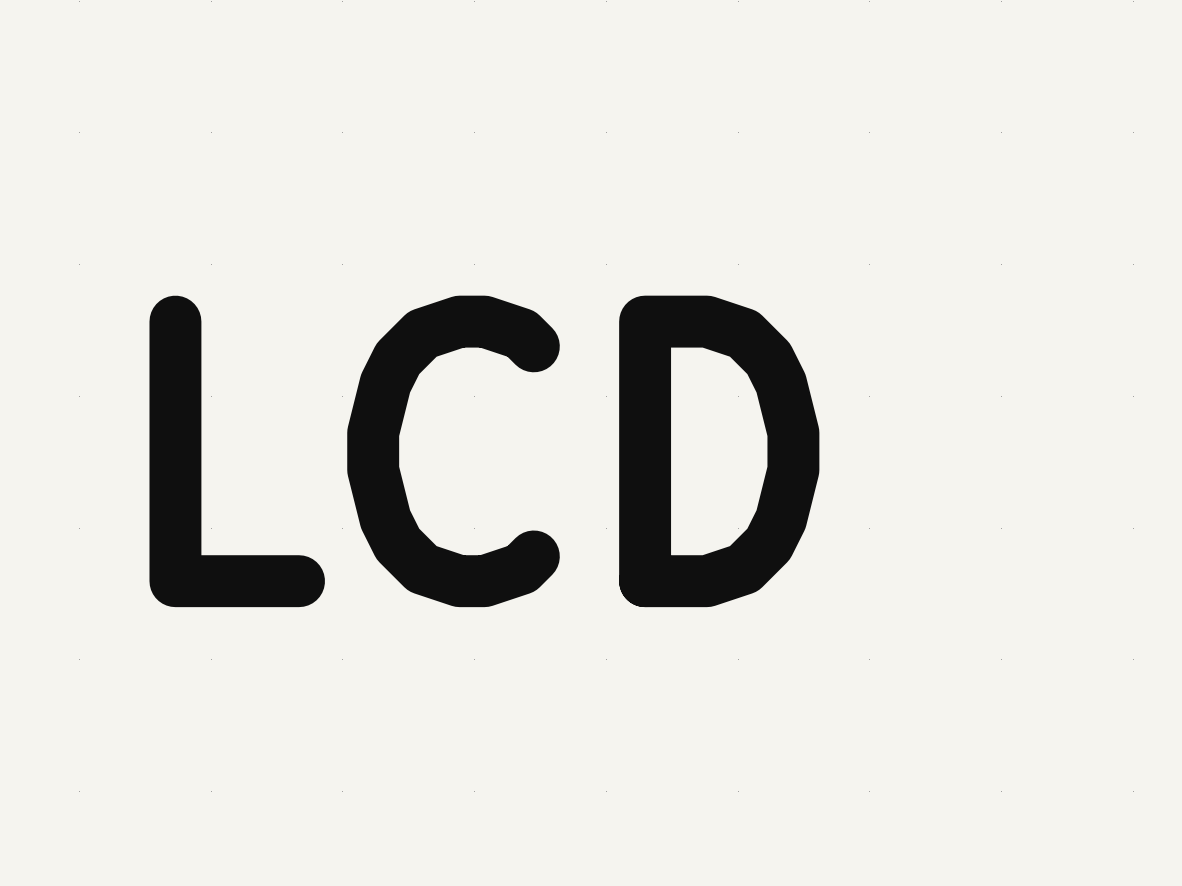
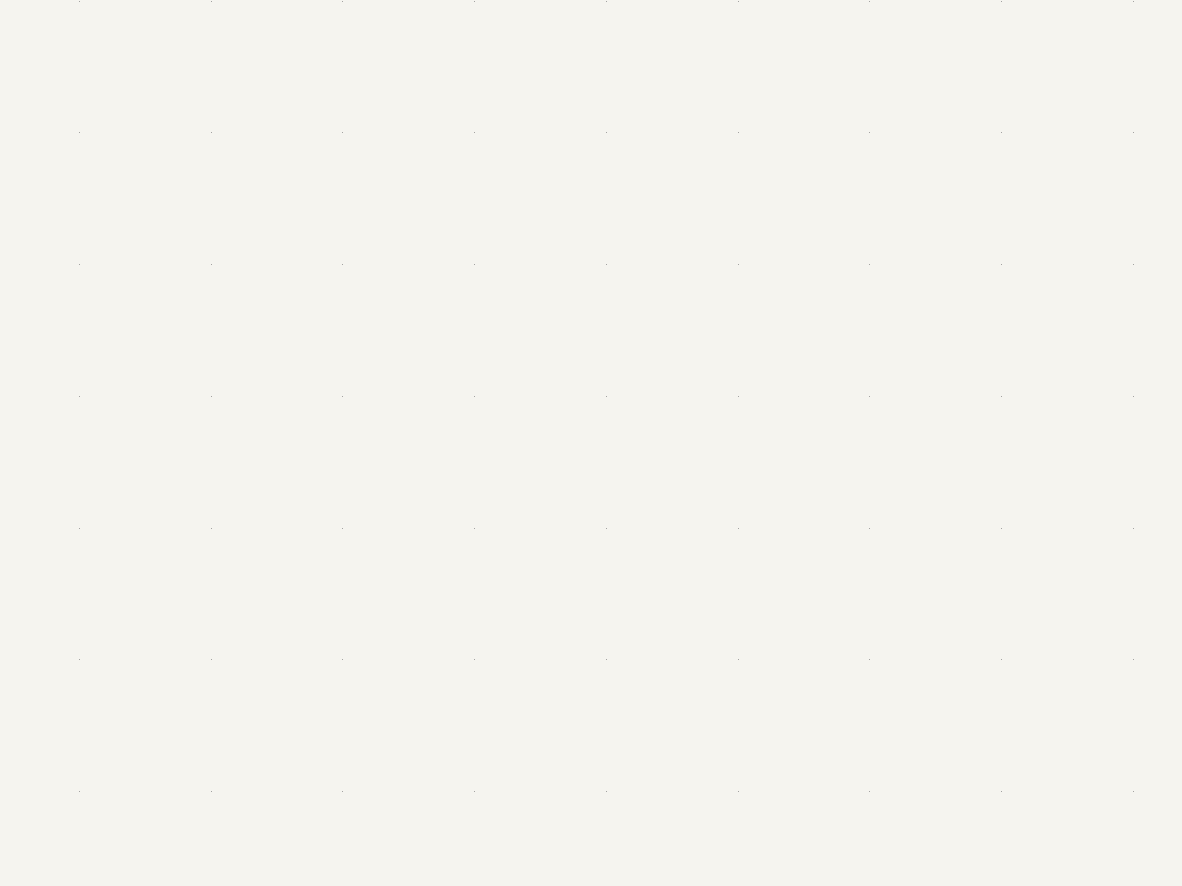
label: LCD (484, 451) -> none

